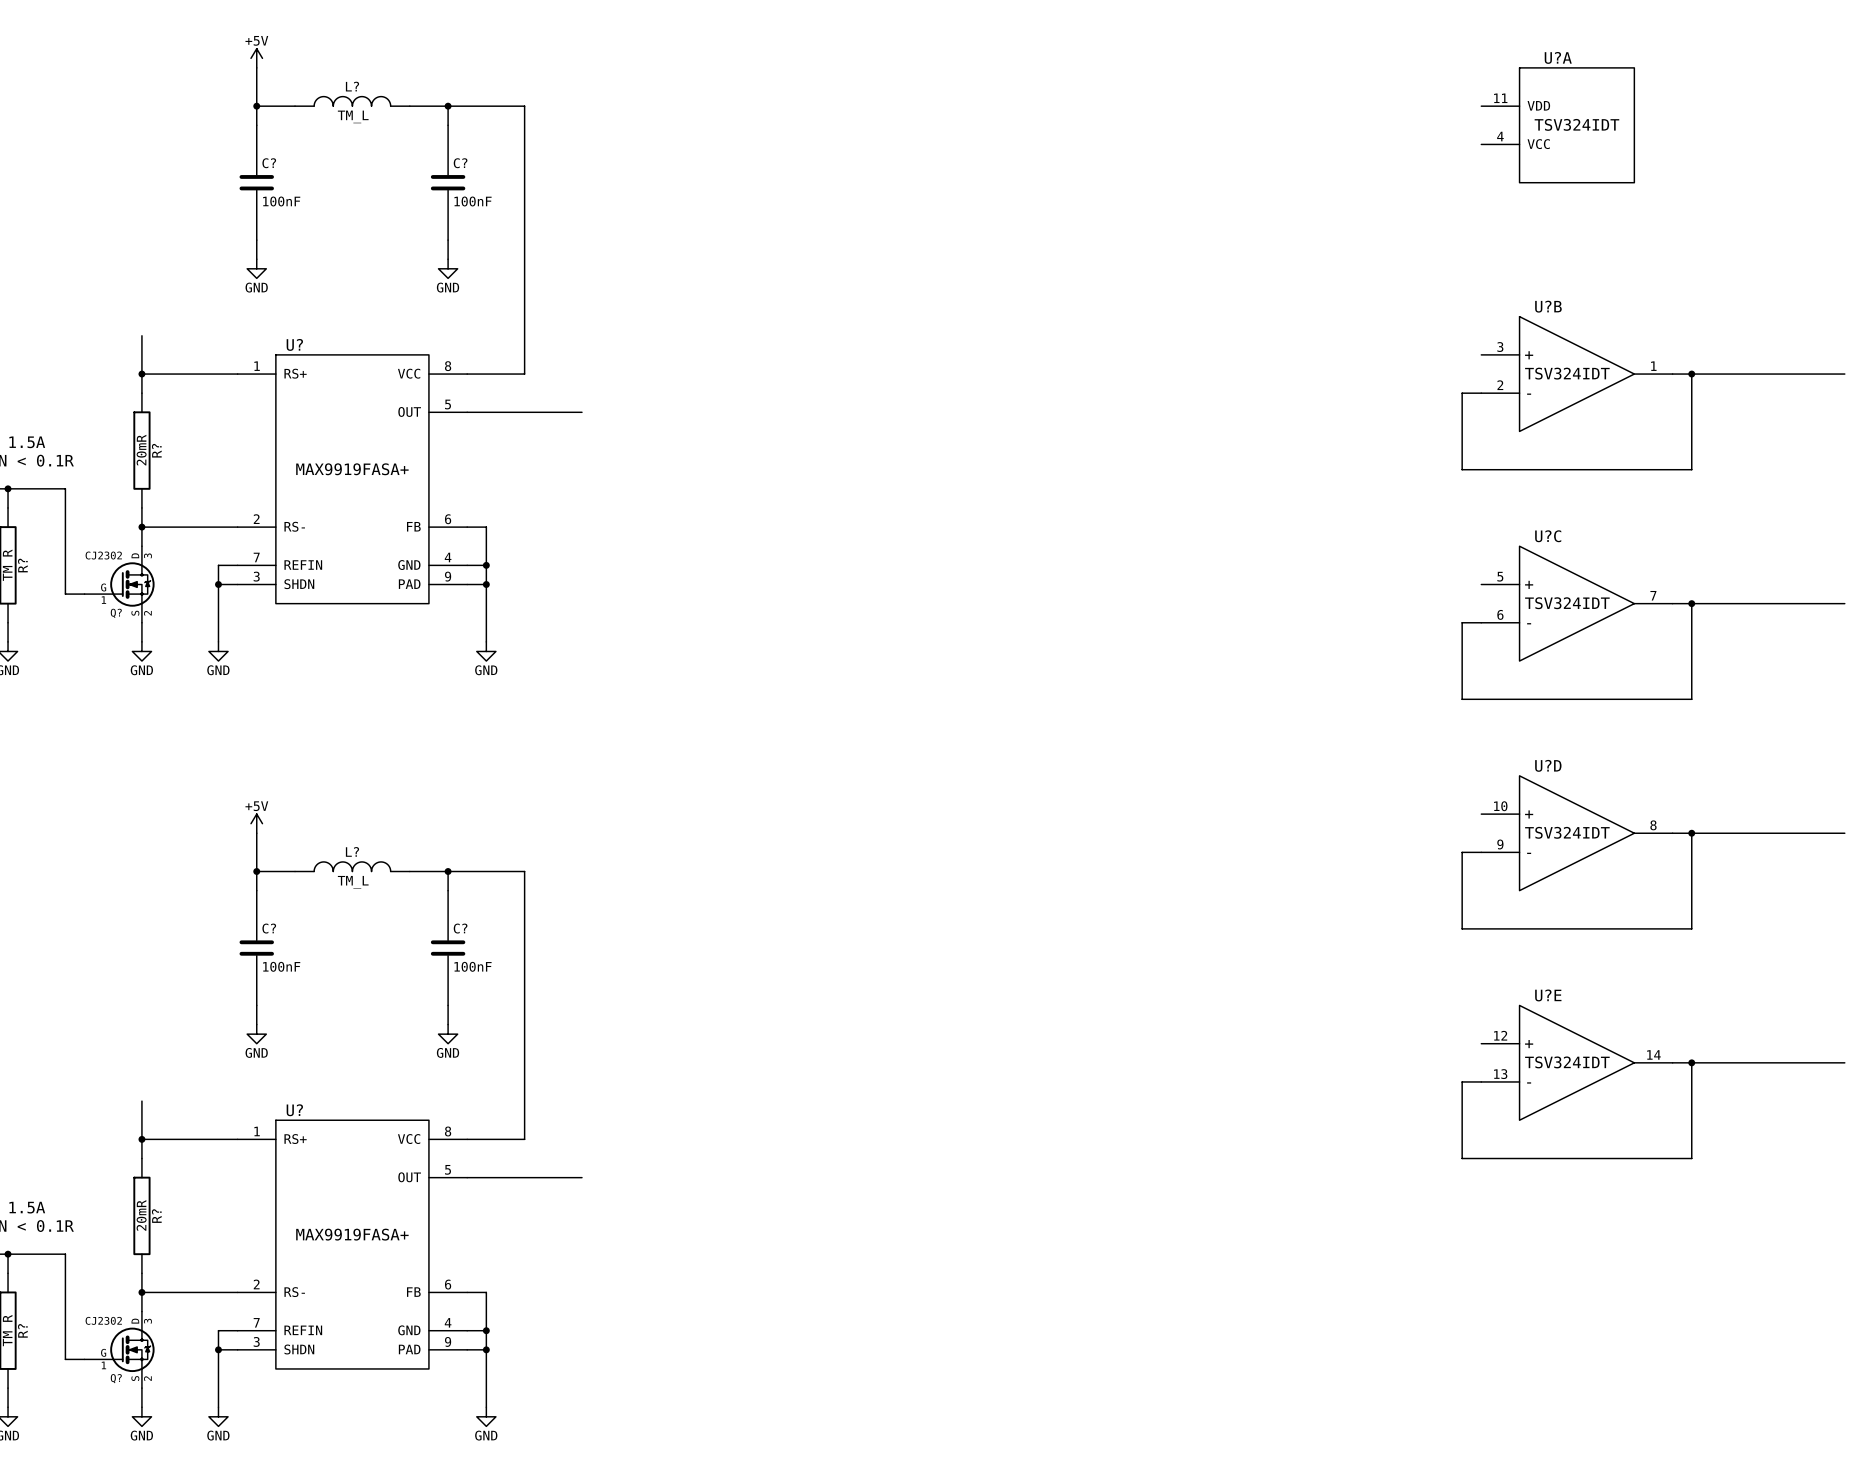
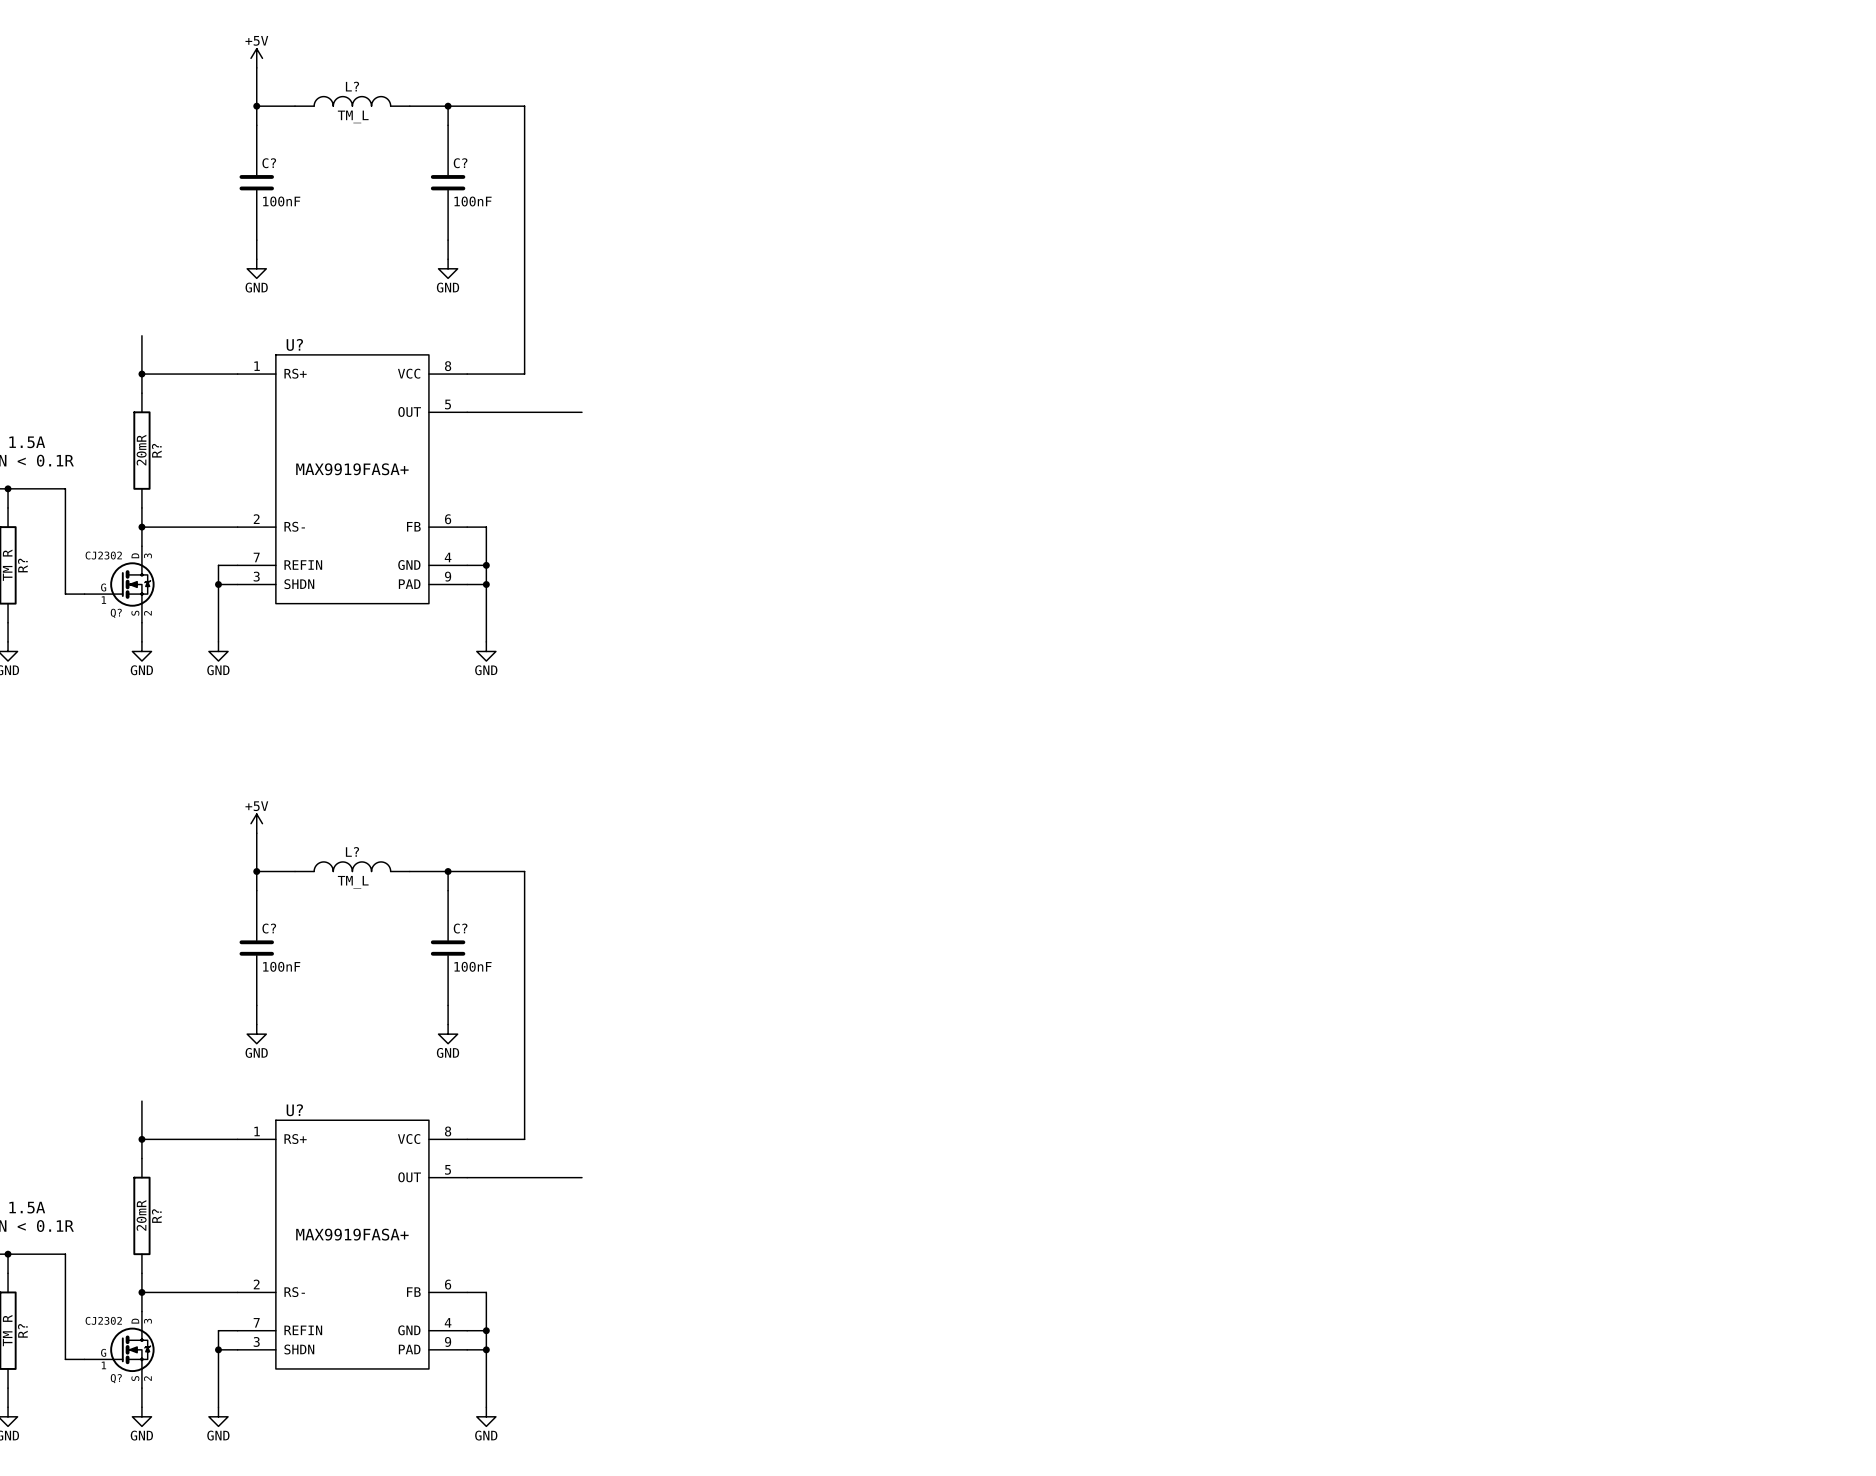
U?A: TSV324IDT (1557, 125) -> none
U?B: TSV324IDT (1576, 374) -> none
wire: (1672, 374) (1844, 374) -> none
wire: (1691, 374) (1691, 469) (1462, 469) (1462, 393) (1481, 393) -> none
junction: (1691, 374) -> none
U?C: TSV324IDT (1576, 603) -> none
wire: (1672, 603) (1844, 603) -> none
wire: (1691, 603) (1691, 699) (1462, 699) (1462, 622) (1481, 622) -> none
junction: (1691, 603) -> none
U?D: TSV324IDT (1576, 833) -> none
wire: (1672, 833) (1844, 833) -> none
wire: (1691, 833) (1691, 928) (1462, 928) (1462, 852) (1481, 852) -> none
junction: (1691, 833) -> none
U?E: TSV324IDT (1576, 1062) -> none
wire: (1672, 1062) (1844, 1062) -> none
wire: (1691, 1062) (1691, 1158) (1462, 1158) (1462, 1081) (1481, 1081) -> none
junction: (1691, 1062) -> none

